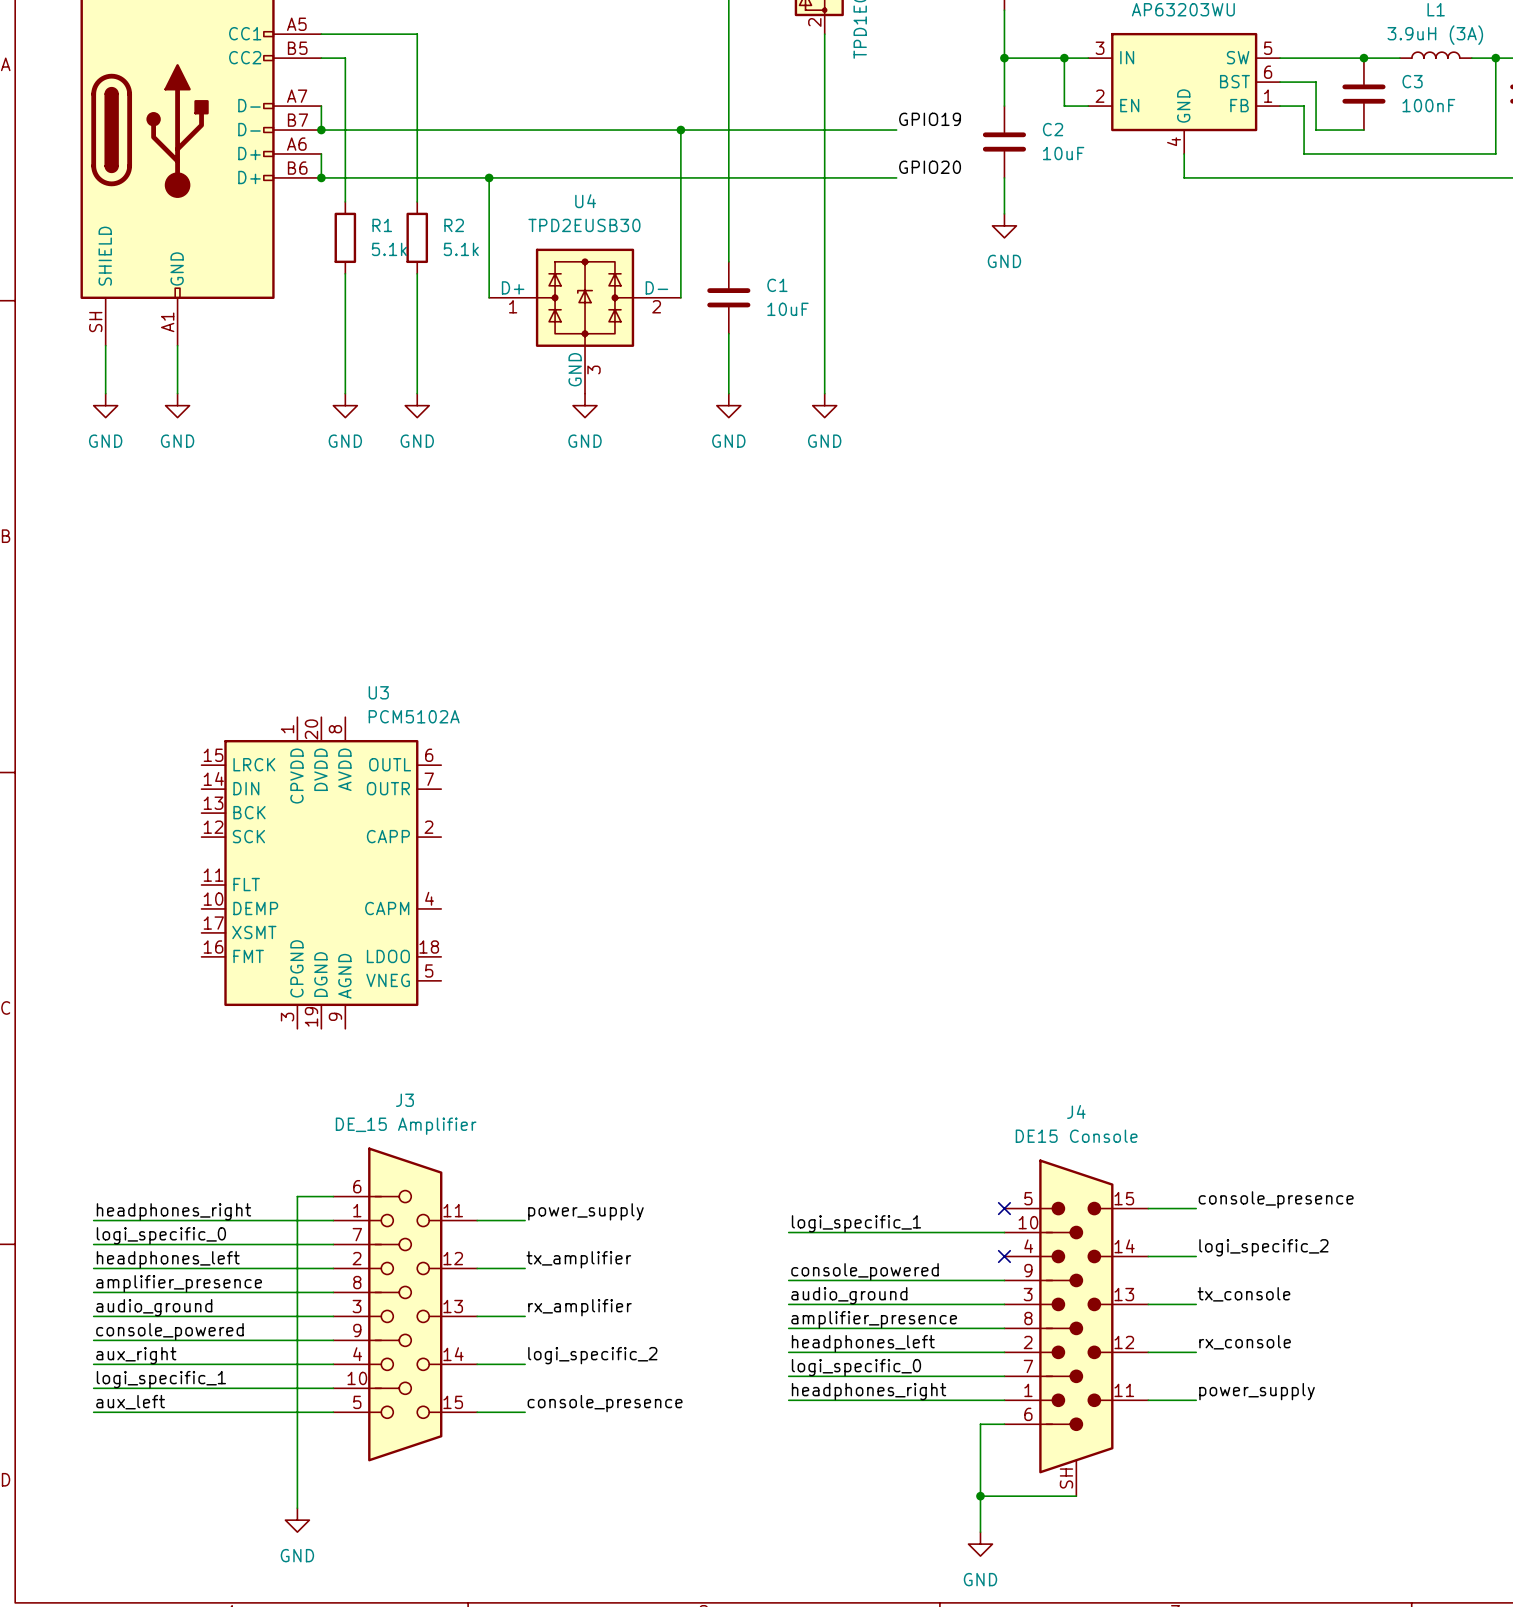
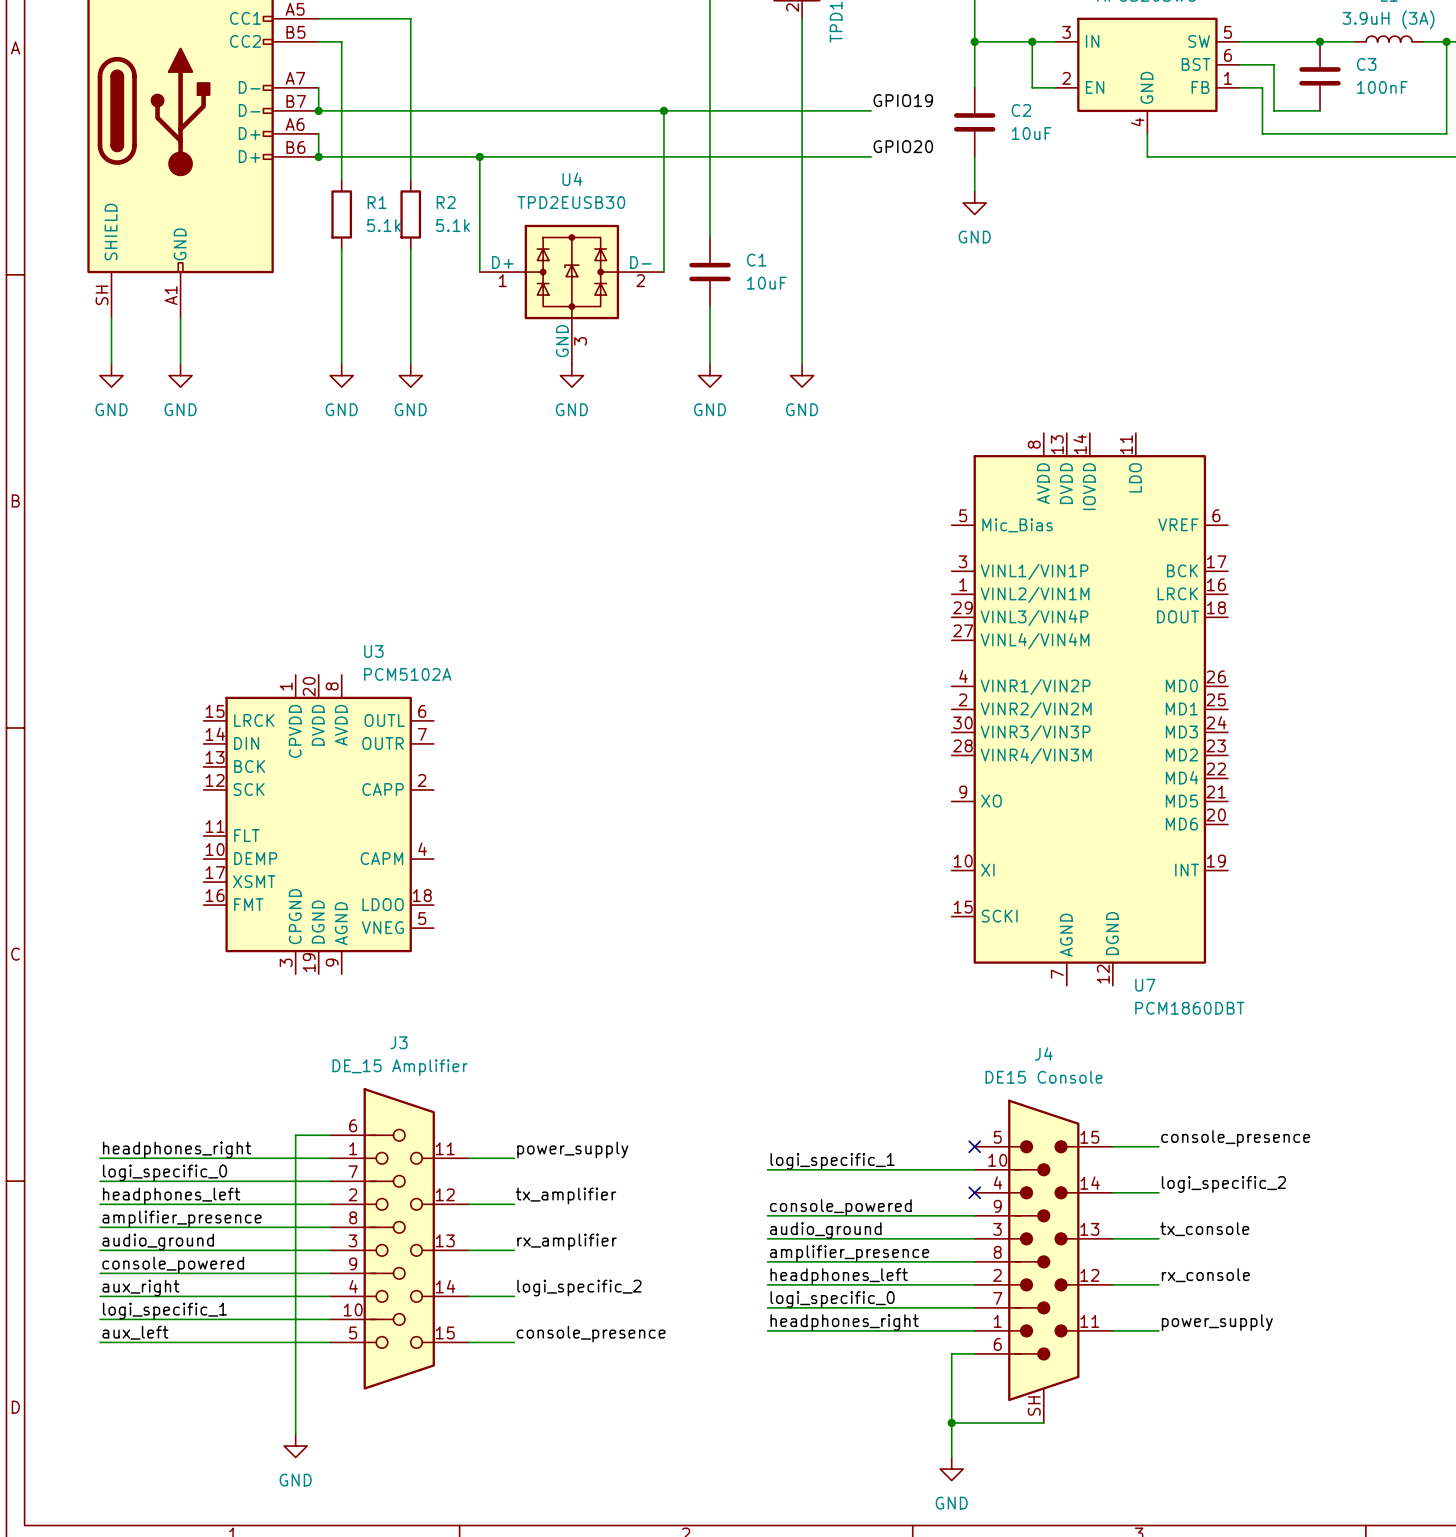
U7: none -> PCM1860DBT (1089, 709)

